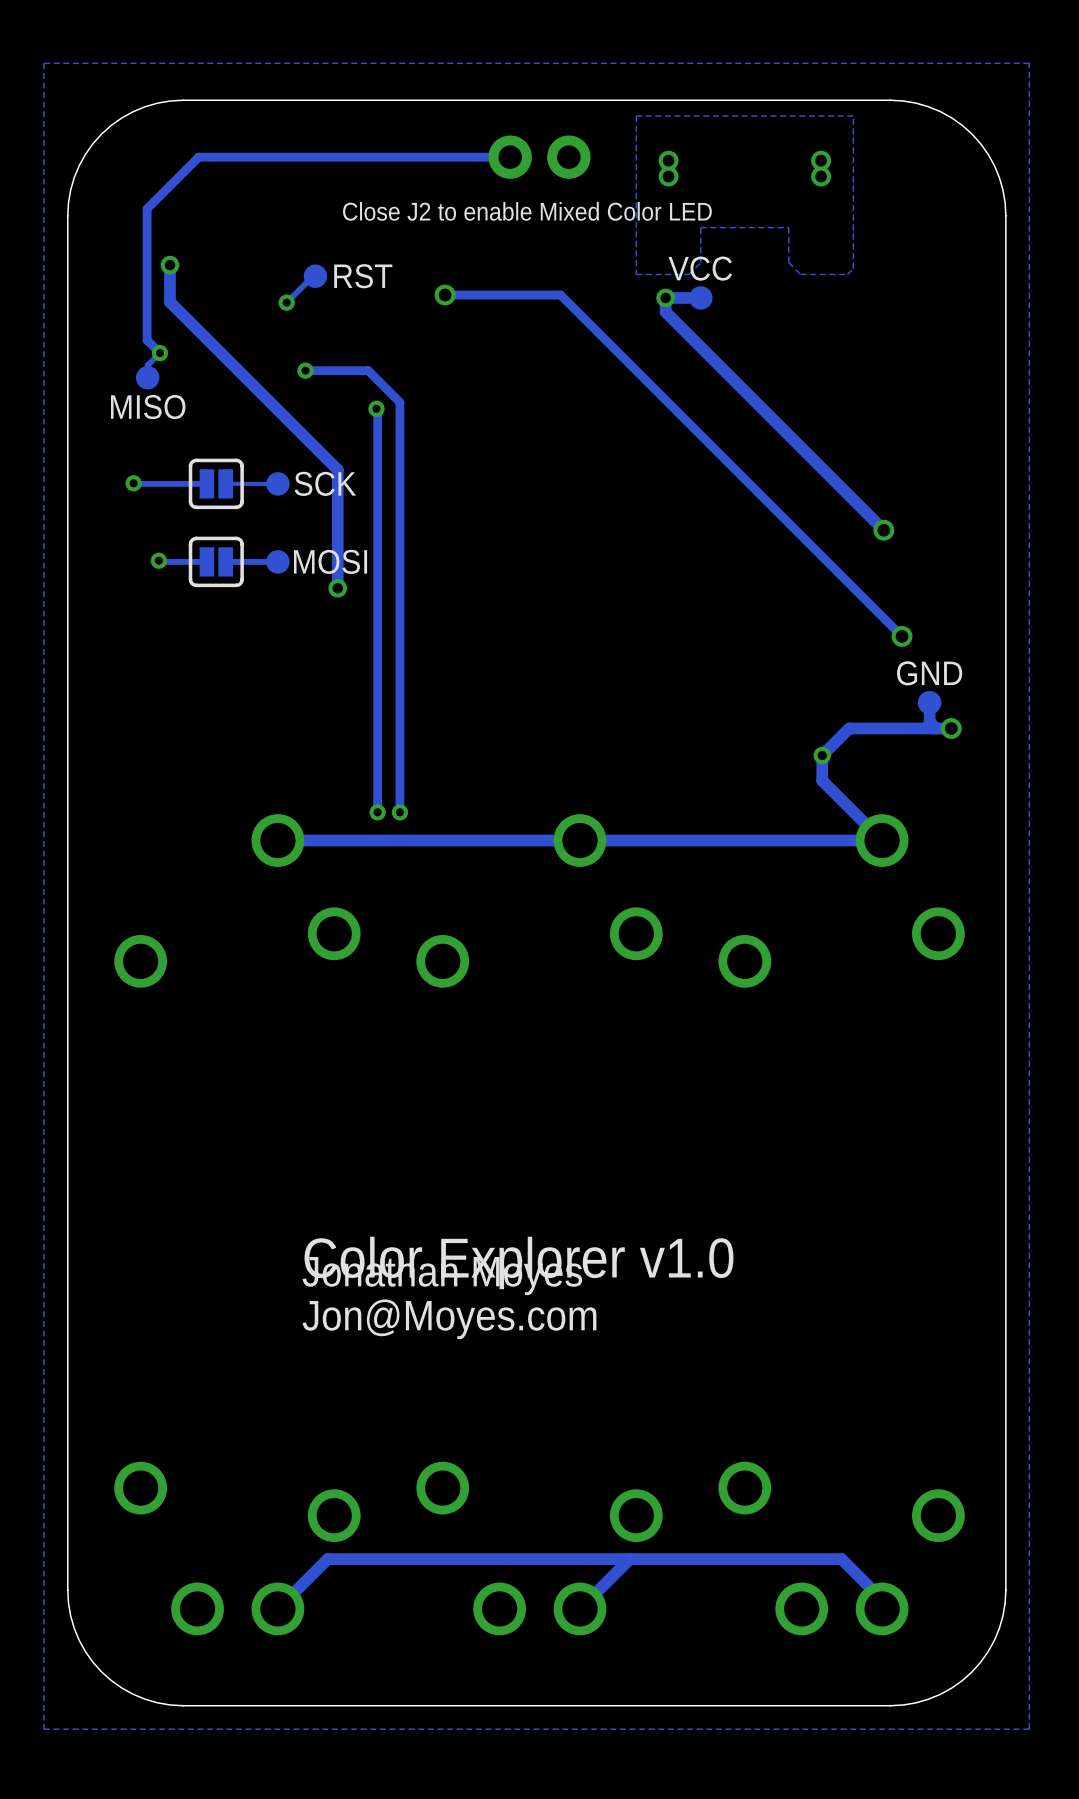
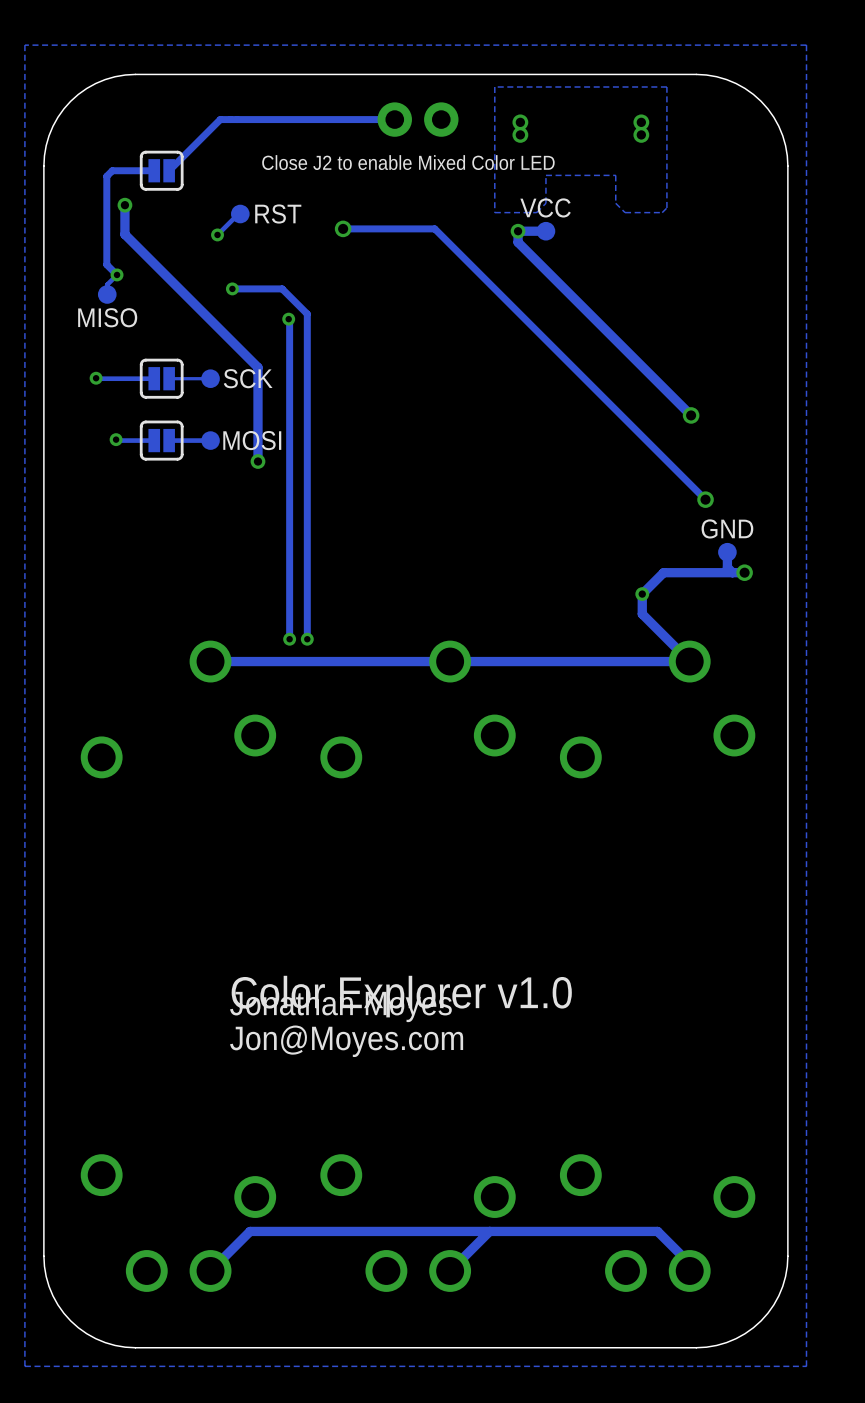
track: (290, 157) (198, 157) (147, 208) (147, 228) -> (220, 119) (169, 170)
track: none -> (154, 170) (112, 170) (106, 176)
part: none -> (161, 170)

